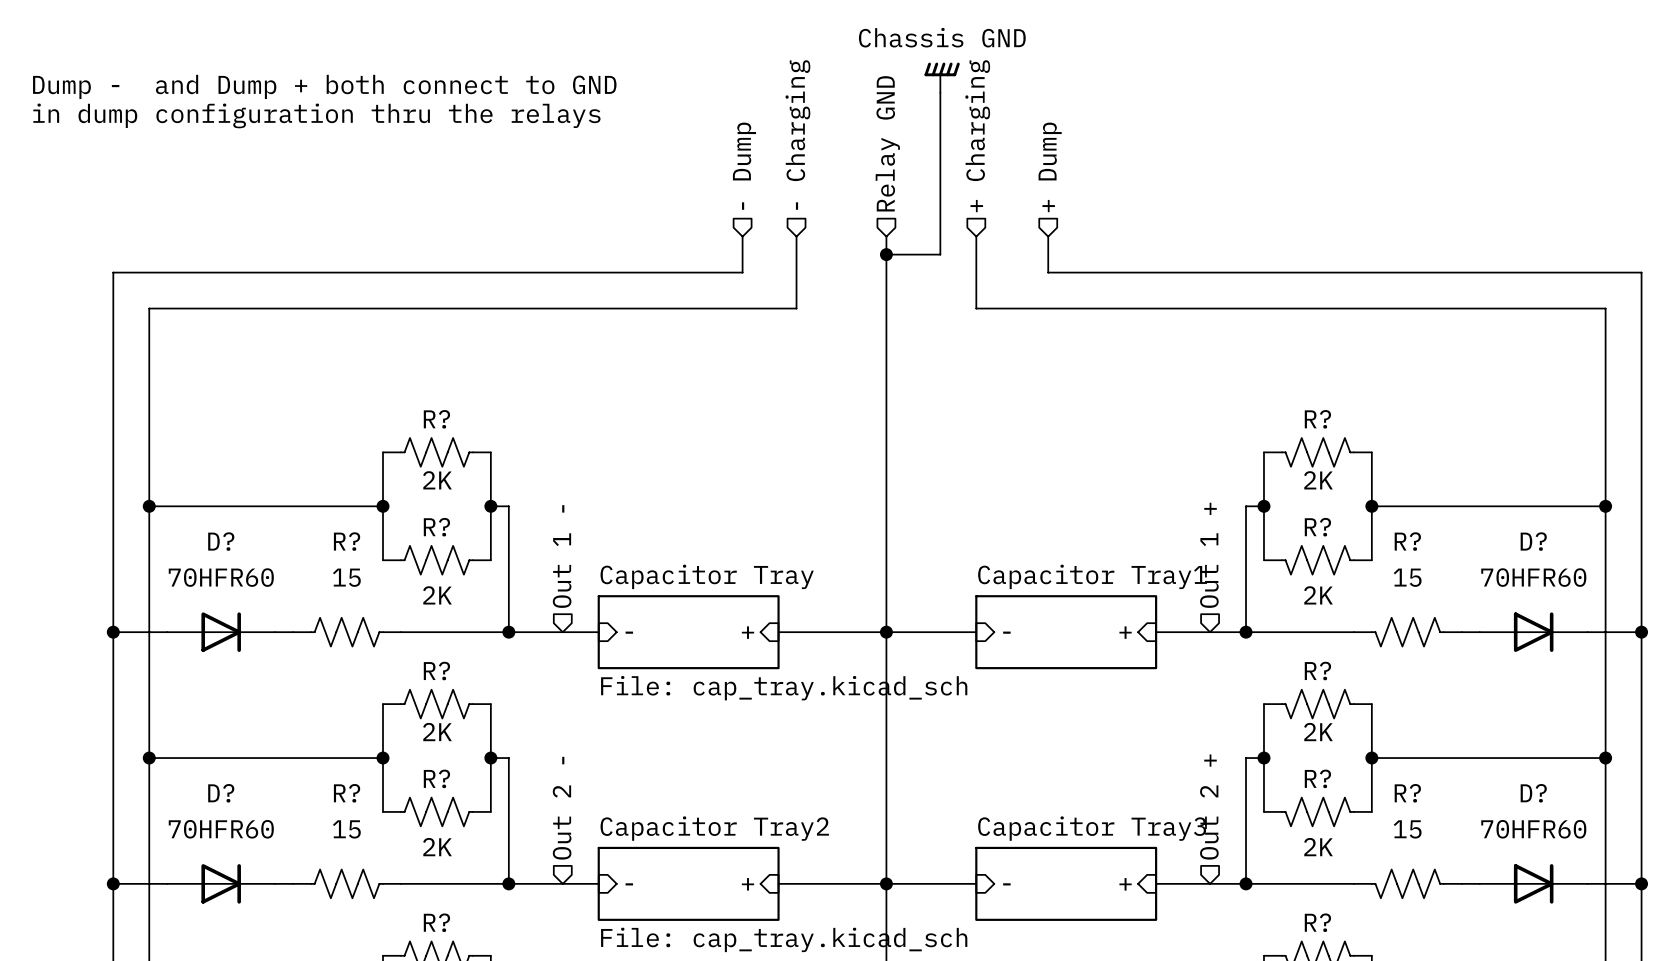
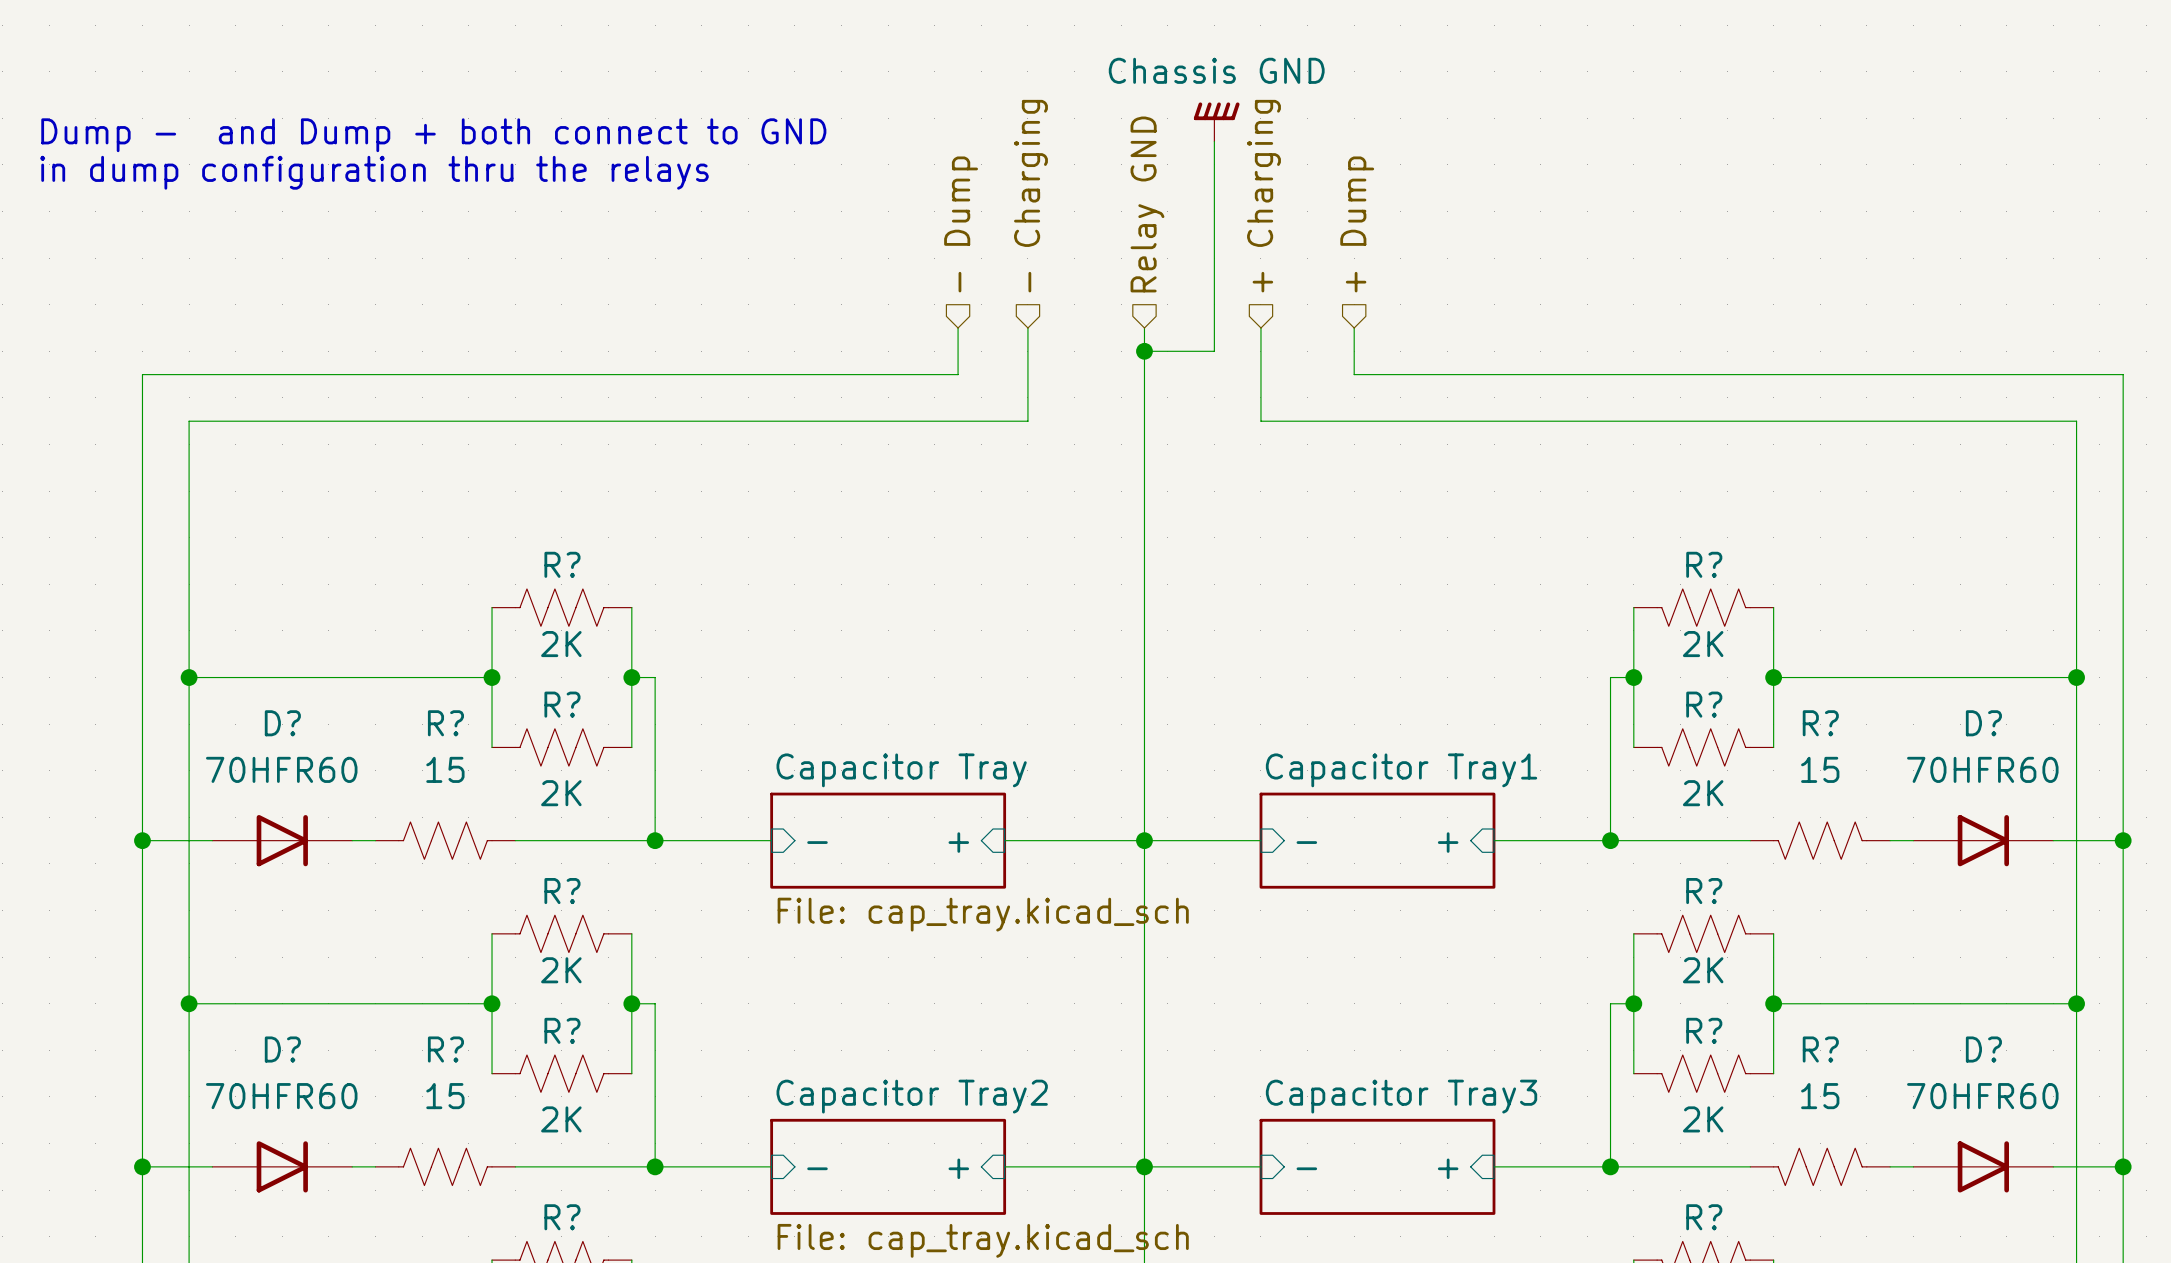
hierarchical label: Out 1 + (1209, 555) -> none
hierarchical label: Out 1 - (562, 556) -> none
hierarchical label: Out 2 + (1209, 807) -> none
hierarchical label: Out 2 - (562, 808) -> none

